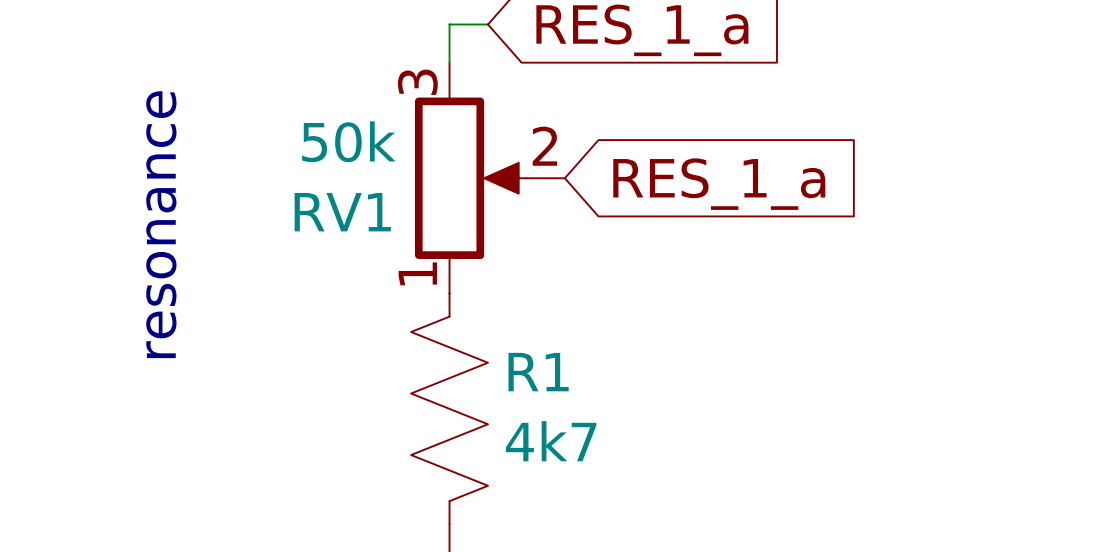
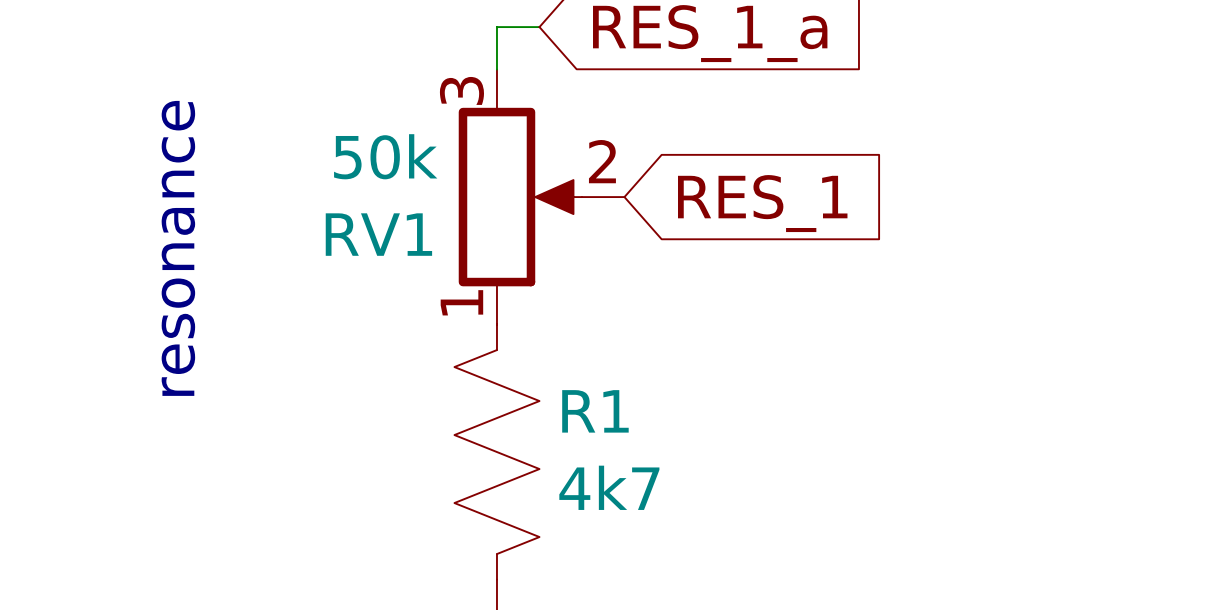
global label: RES_1_a (719, 184) -> RES_1 (762, 203)

